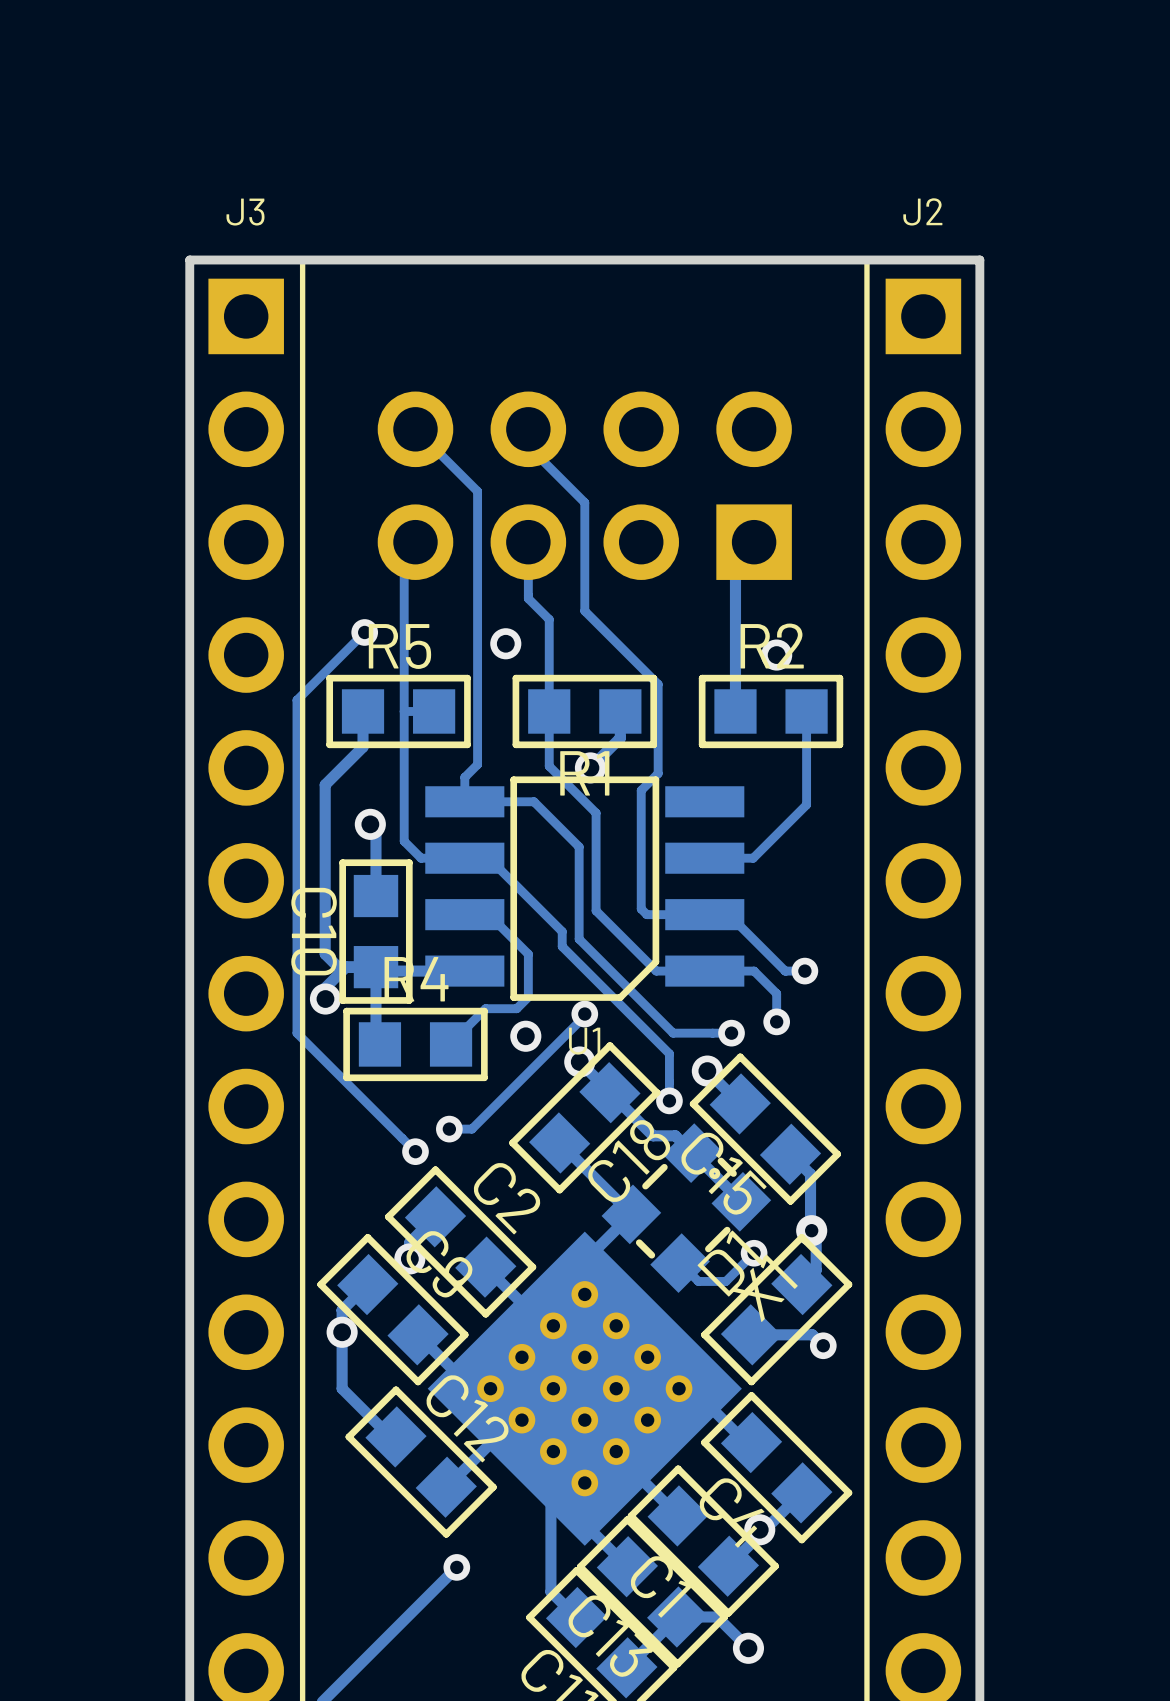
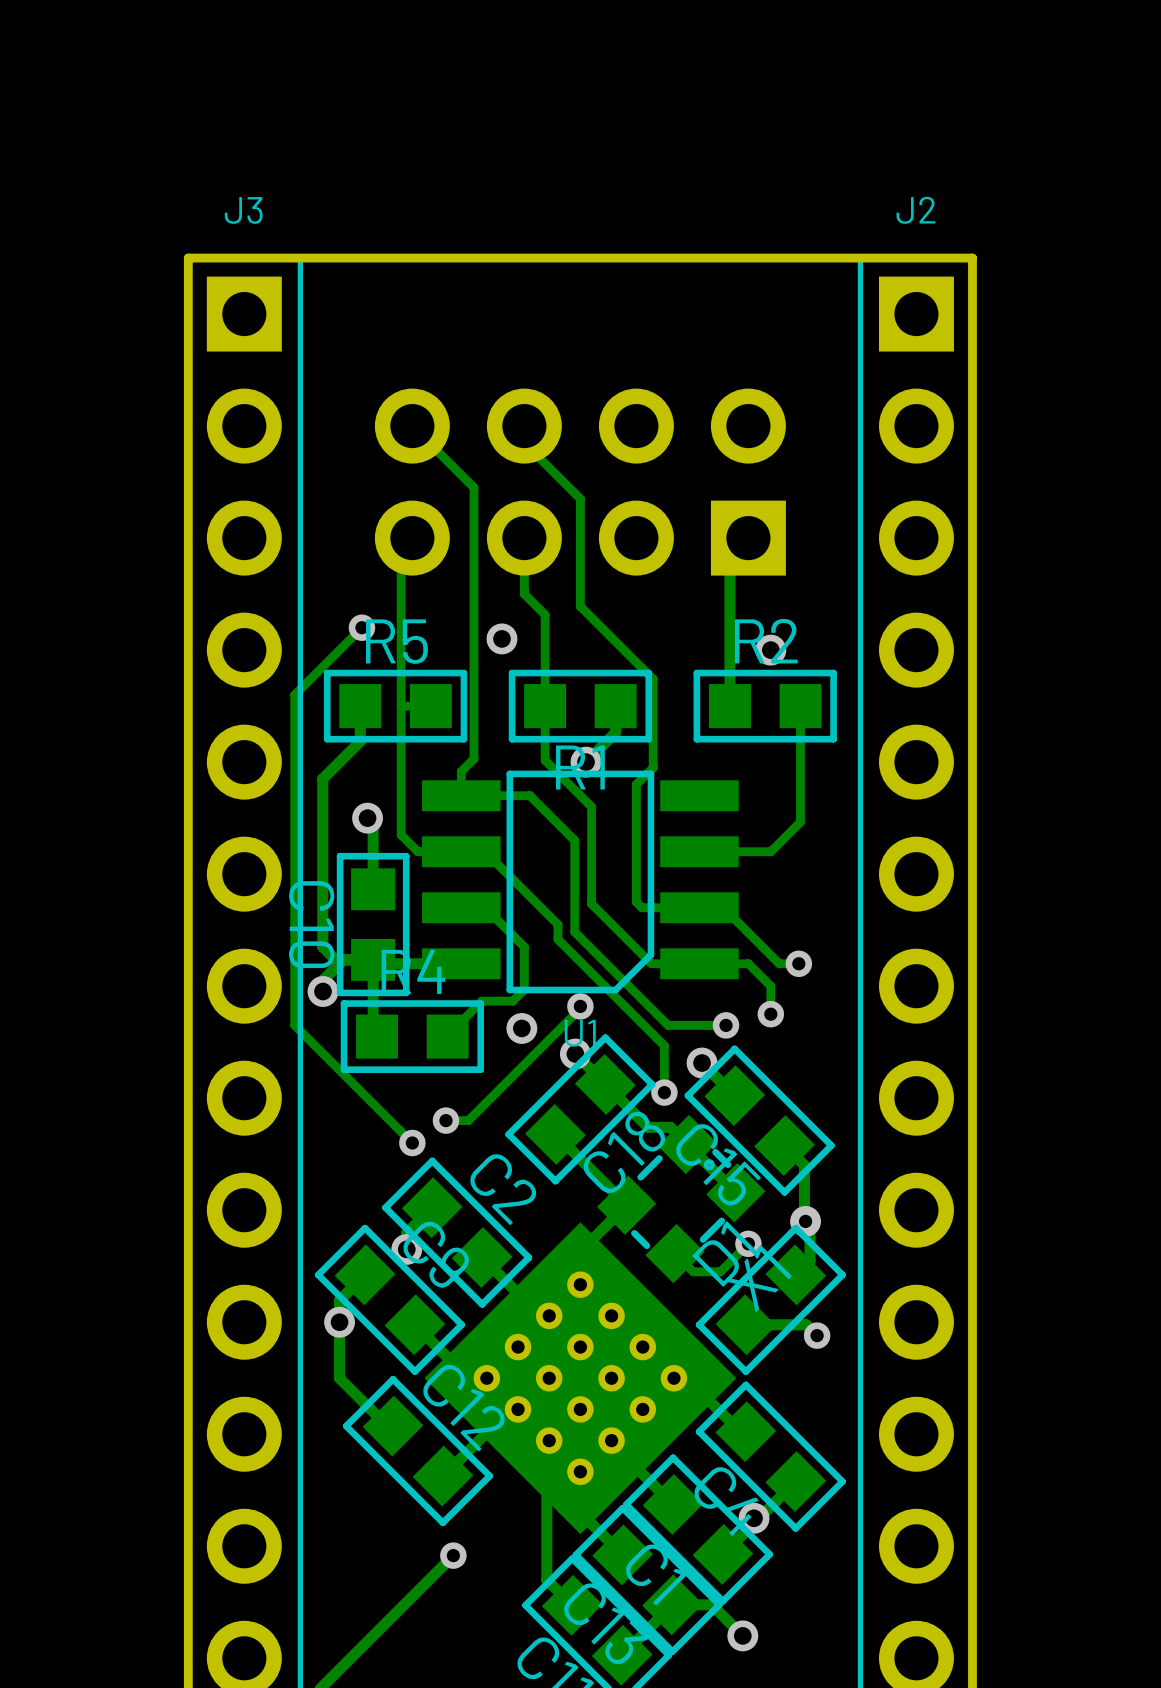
track: (806, 804) (753, 858) -> (800, 798) (800, 822) (770, 851) (747, 851)

